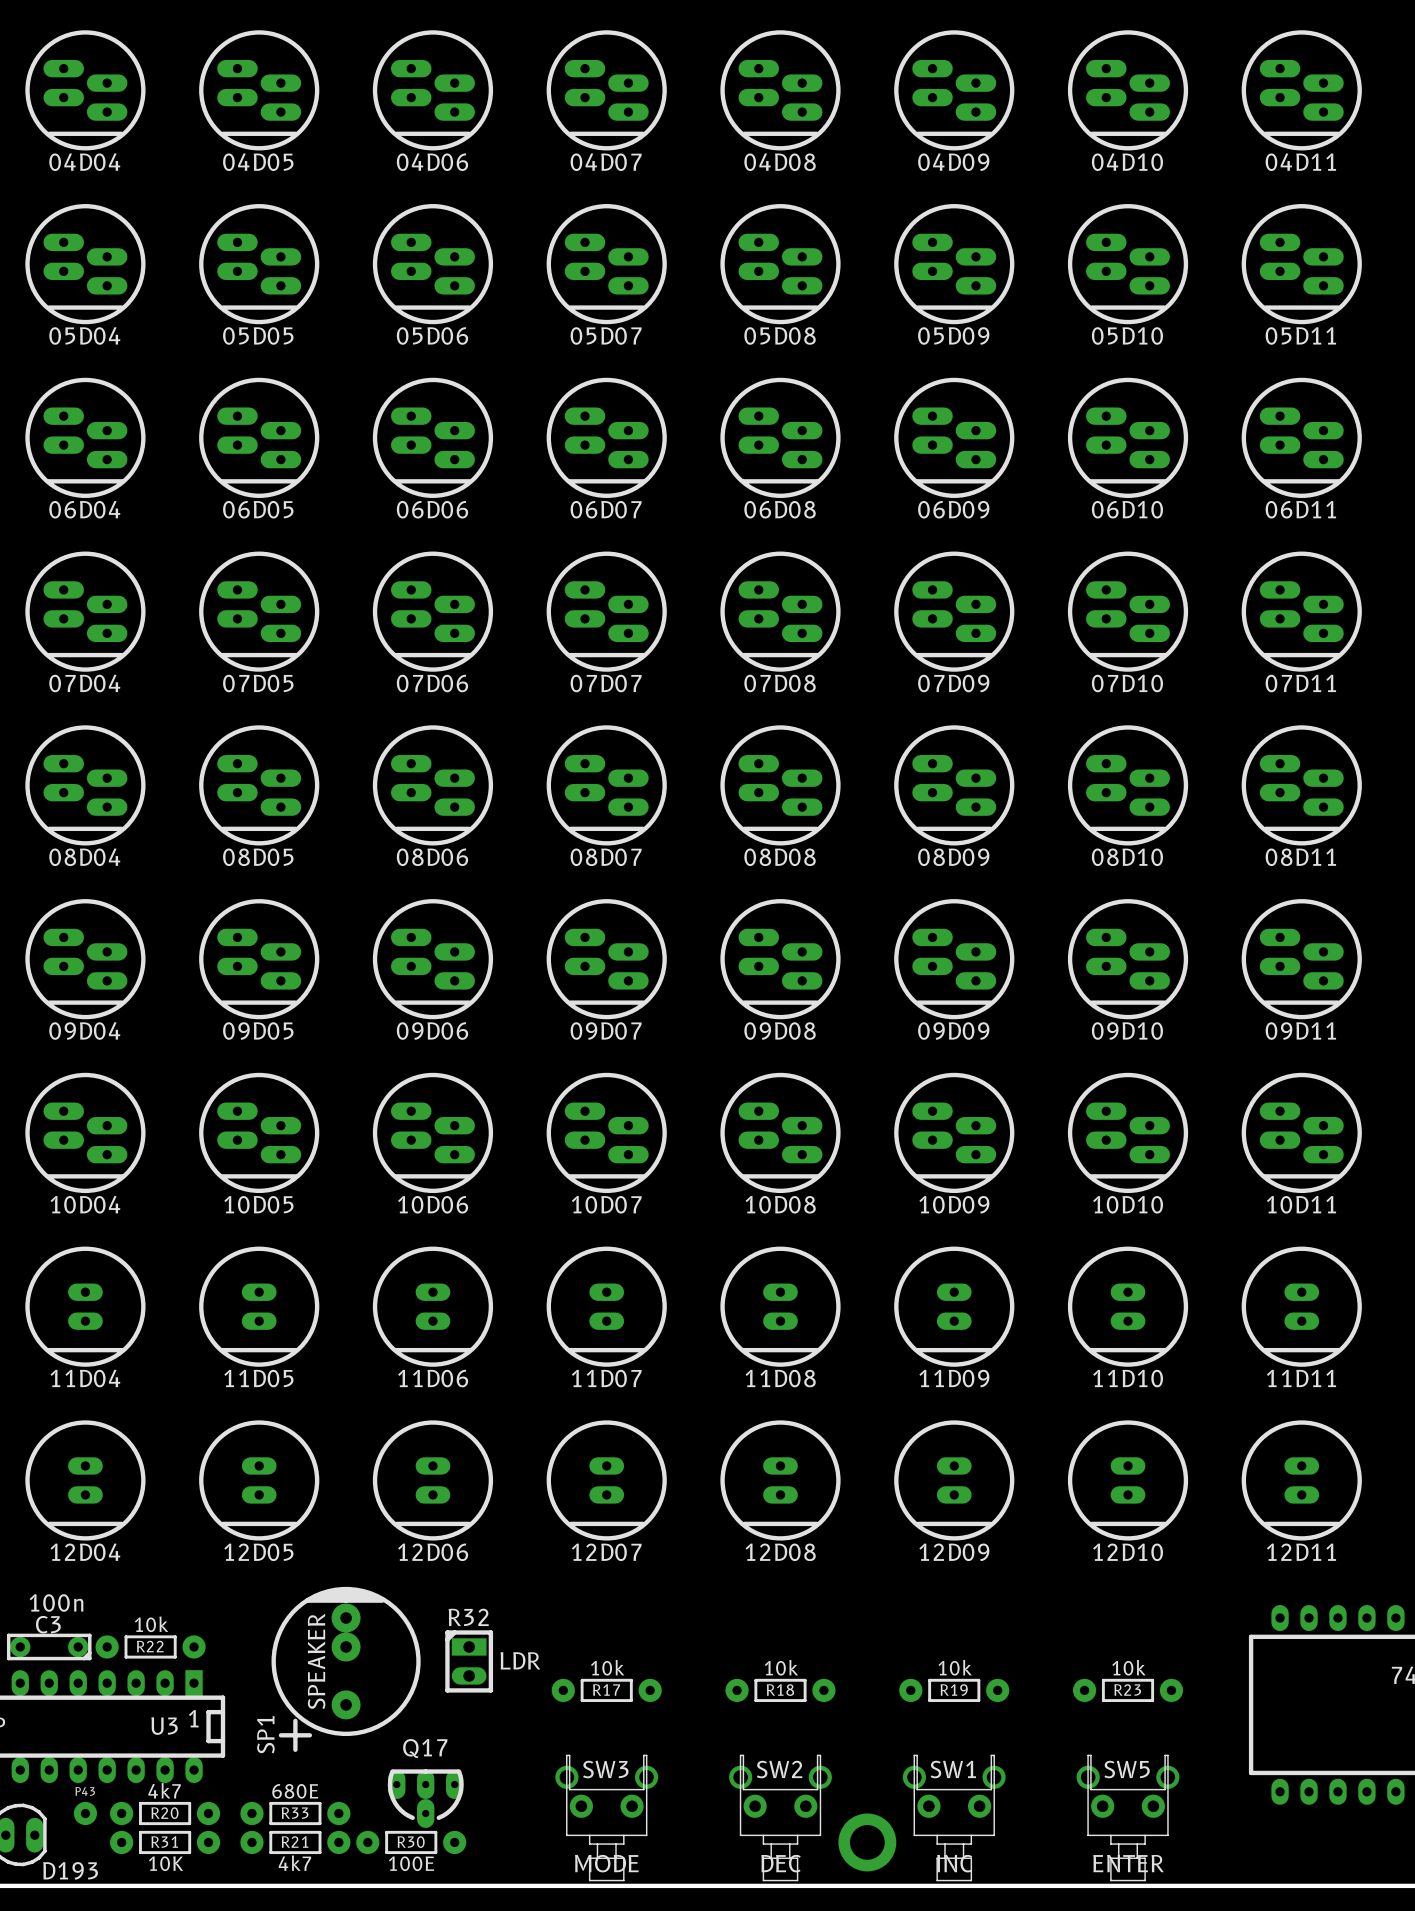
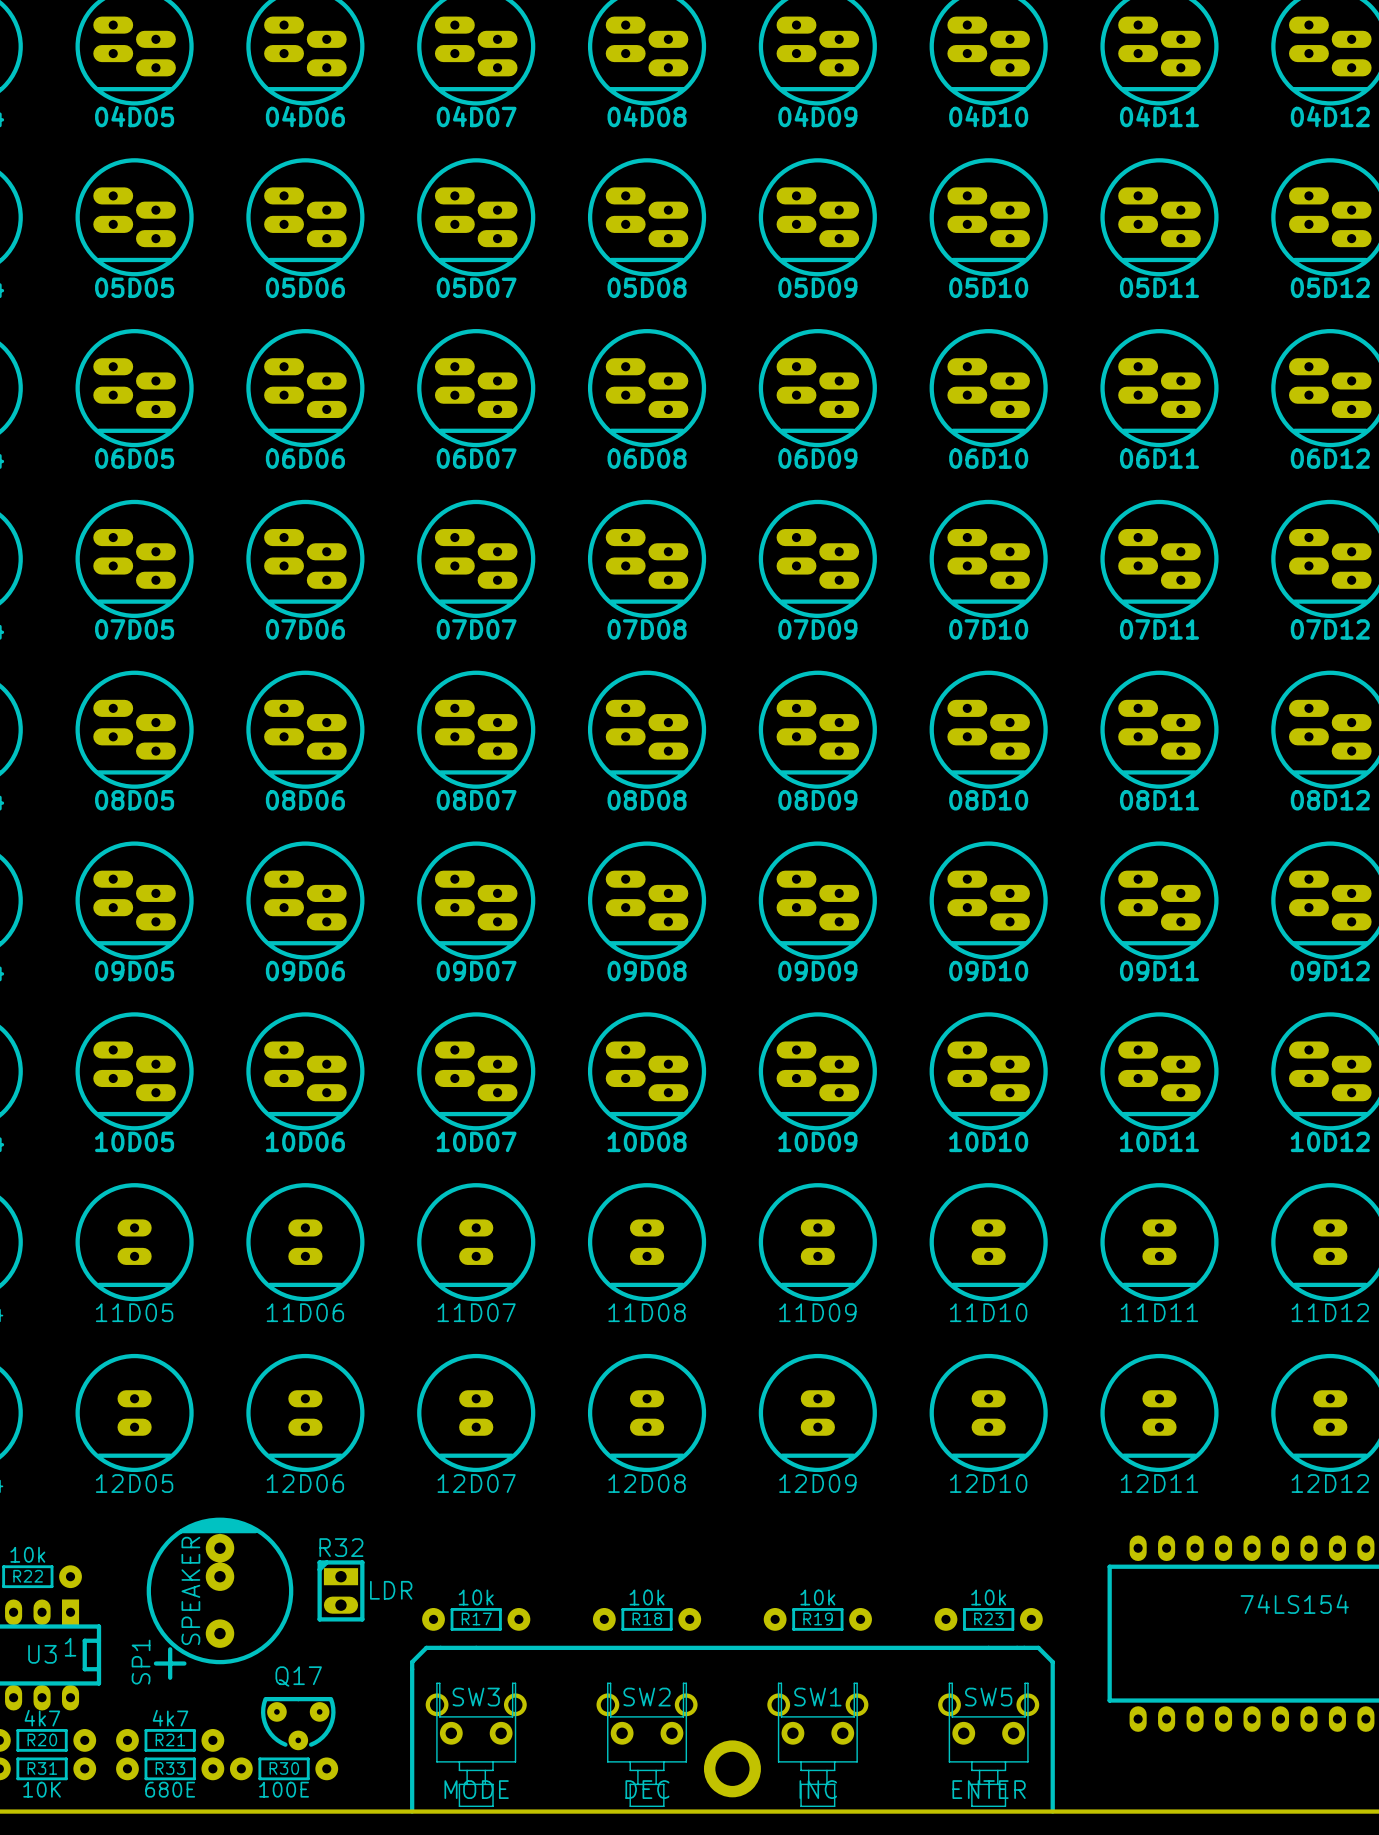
Q17 footprint: [387, 1769, 464, 1828] -> [261, 1696, 336, 1751]
R33 value: 680E (295, 1791) -> 4k7 (170, 1718)
R33 name: R33 (295, 1813) -> R21 (170, 1739)
R21 name: R21 (295, 1842) -> R33 (170, 1768)
R21 value: 4k7 (294, 1863) -> 680E (170, 1789)
line: none -> (412, 1811) (412, 1662) (426, 1647) (1038, 1647) (1052, 1662) (1052, 1811)

